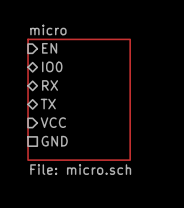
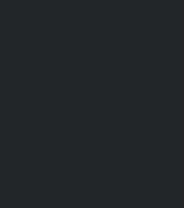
sheet pin: EN (49, 48) -> none
sheet pin: IO0 (52, 66) -> none
sheet pin: RX (50, 85) -> none
sheet micro: File: micro.sch (79, 99) -> none
sheet pin: TX (48, 104) -> none
sheet pin: VCC (53, 122) -> none
sheet pin: GND (54, 141) -> none

